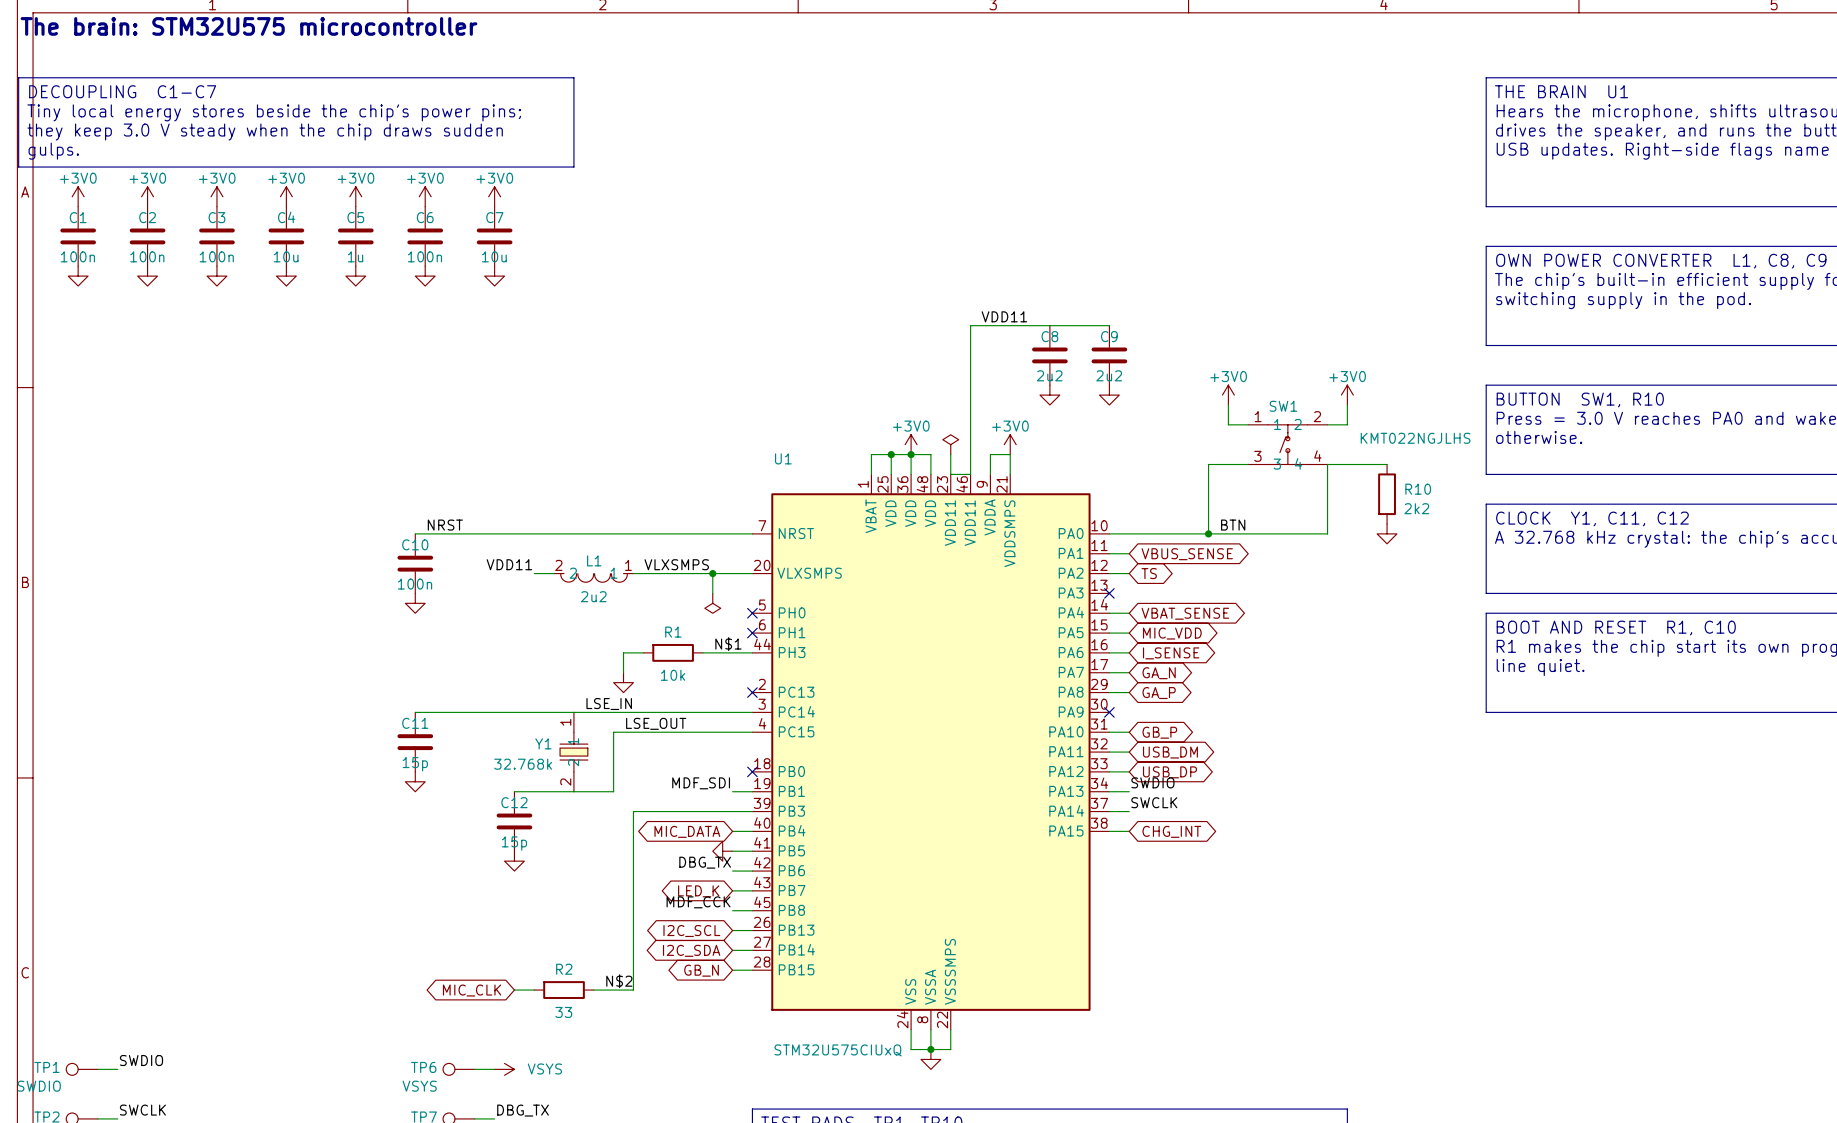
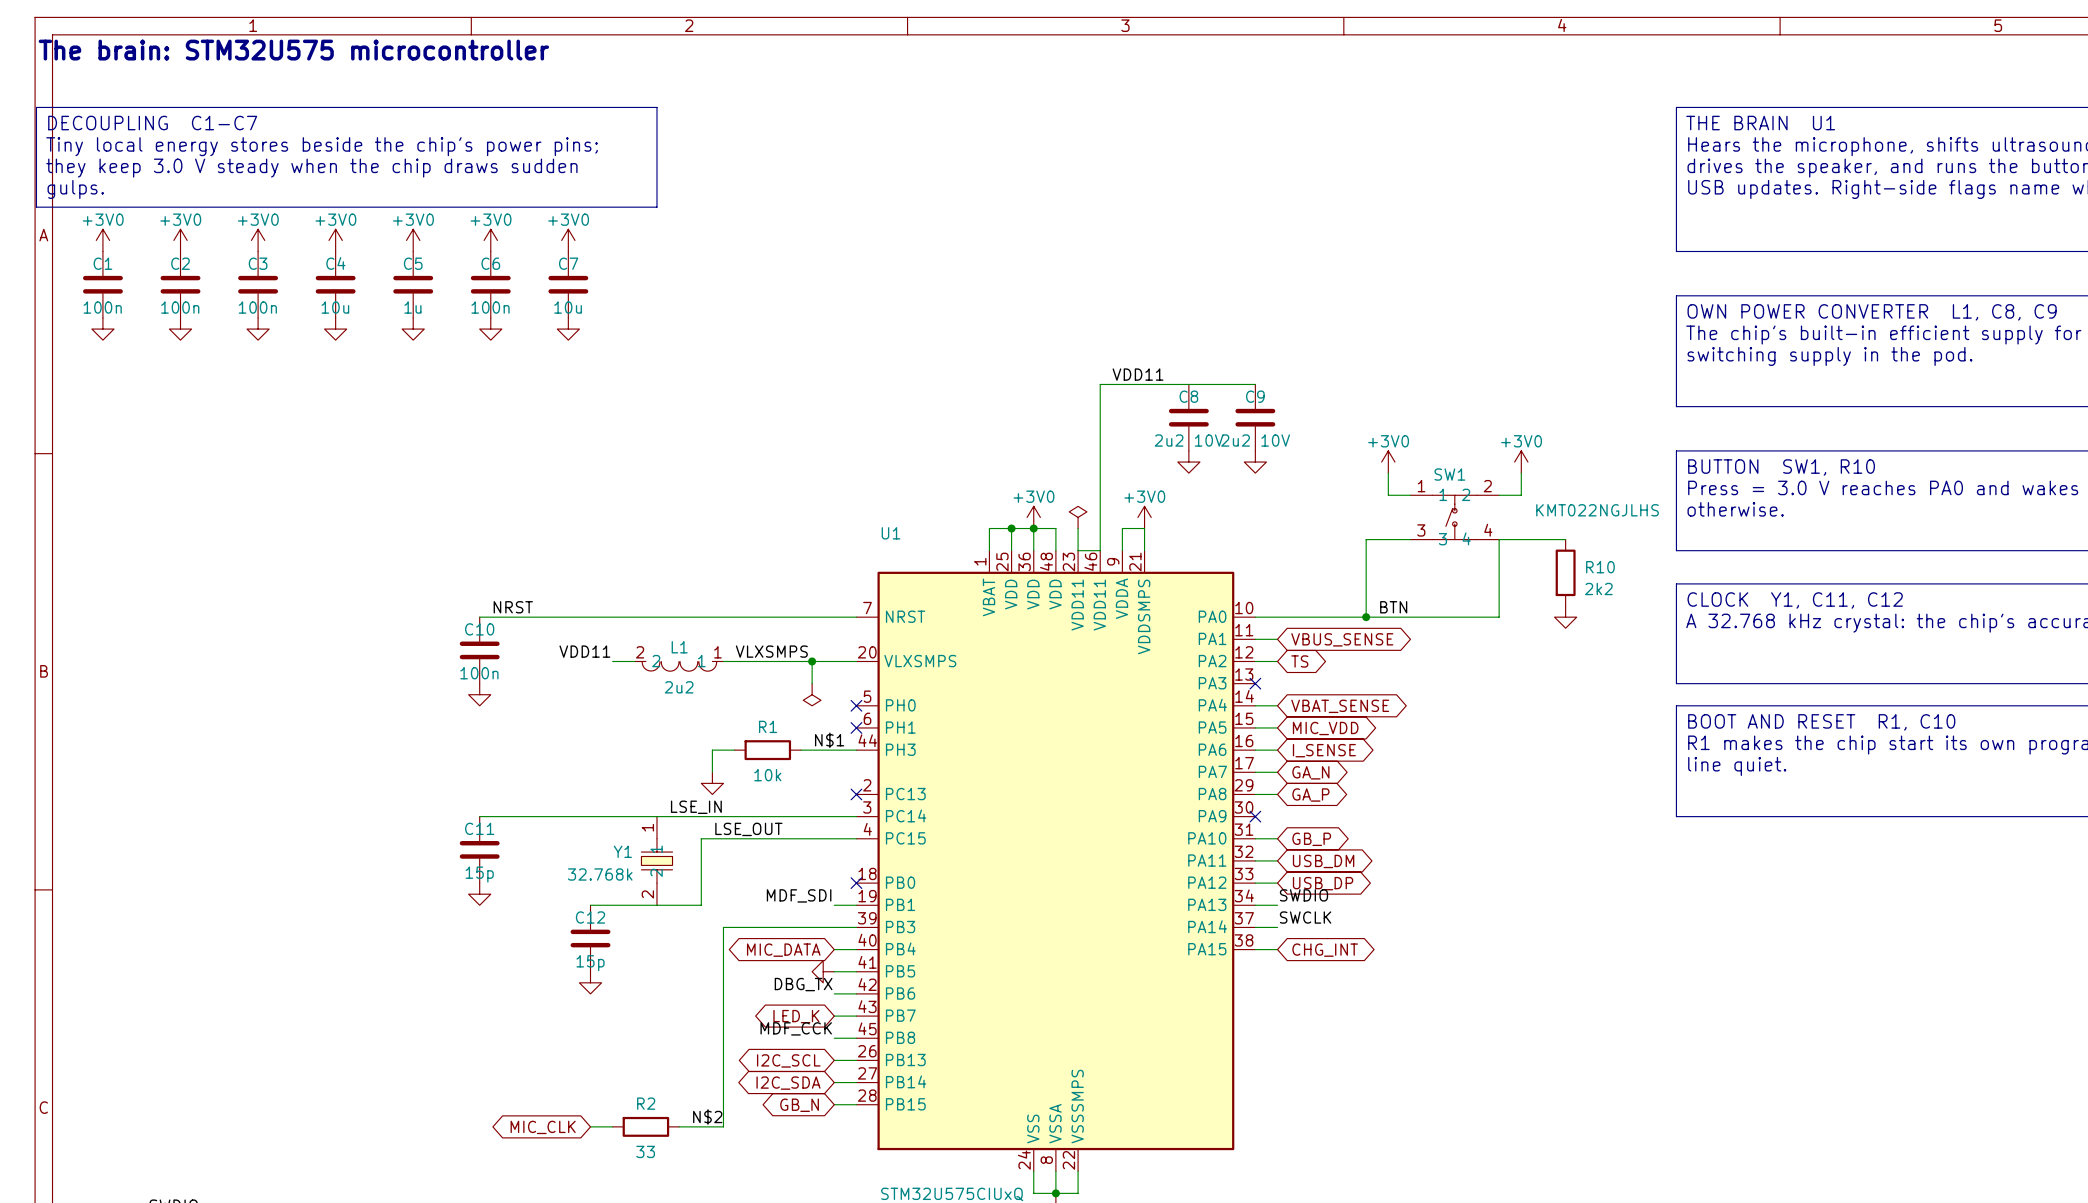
C8 value: 2u2 (1049, 375) -> 2u2 10V (1189, 440)
C9 value: 2u2 (1109, 375) -> 2u2 10V (1255, 440)

